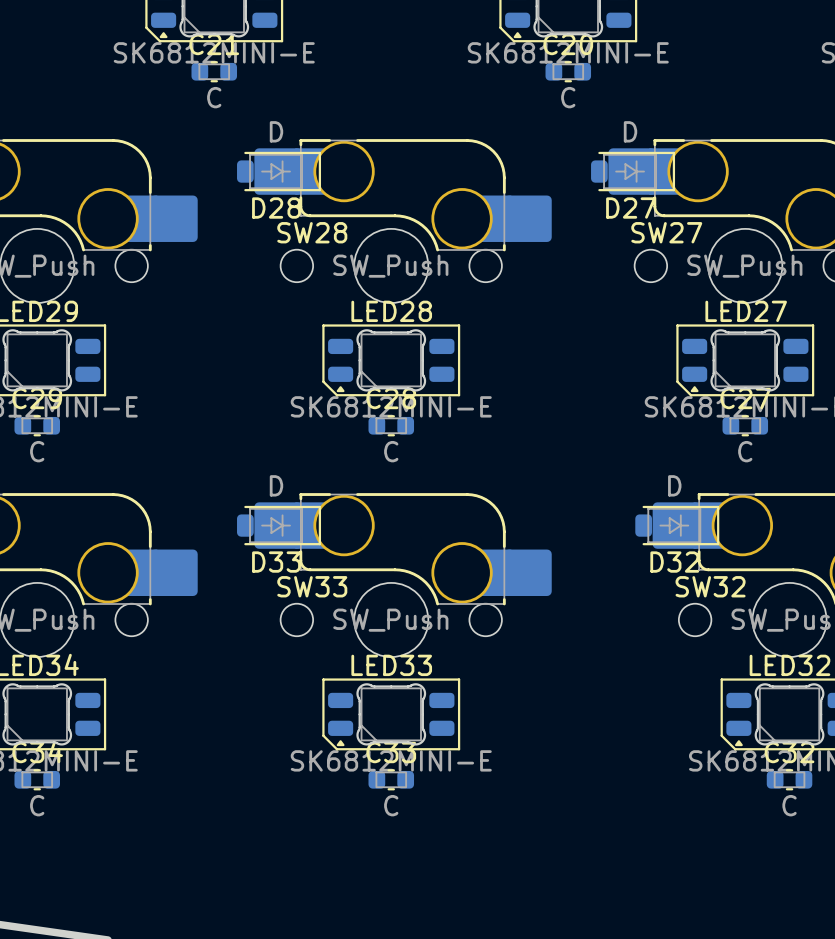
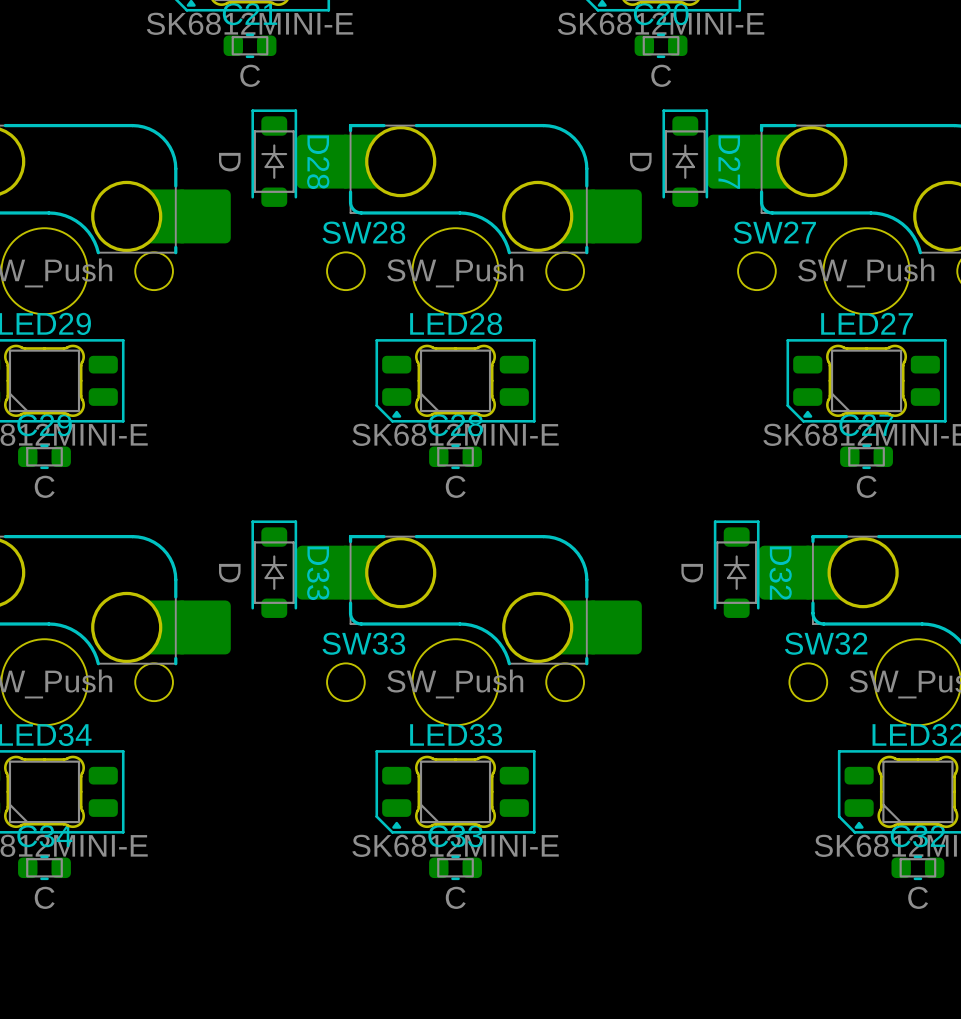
D28 rotation: 0° (279, 171) -> 90° counterclockwise (274, 158)
D27 rotation: 0° (633, 171) -> 90° counterclockwise (685, 158)
D33 rotation: 0° (279, 525) -> 90° counterclockwise (274, 569)
D32 rotation: 0° (677, 525) -> 90° counterclockwise (736, 569)

